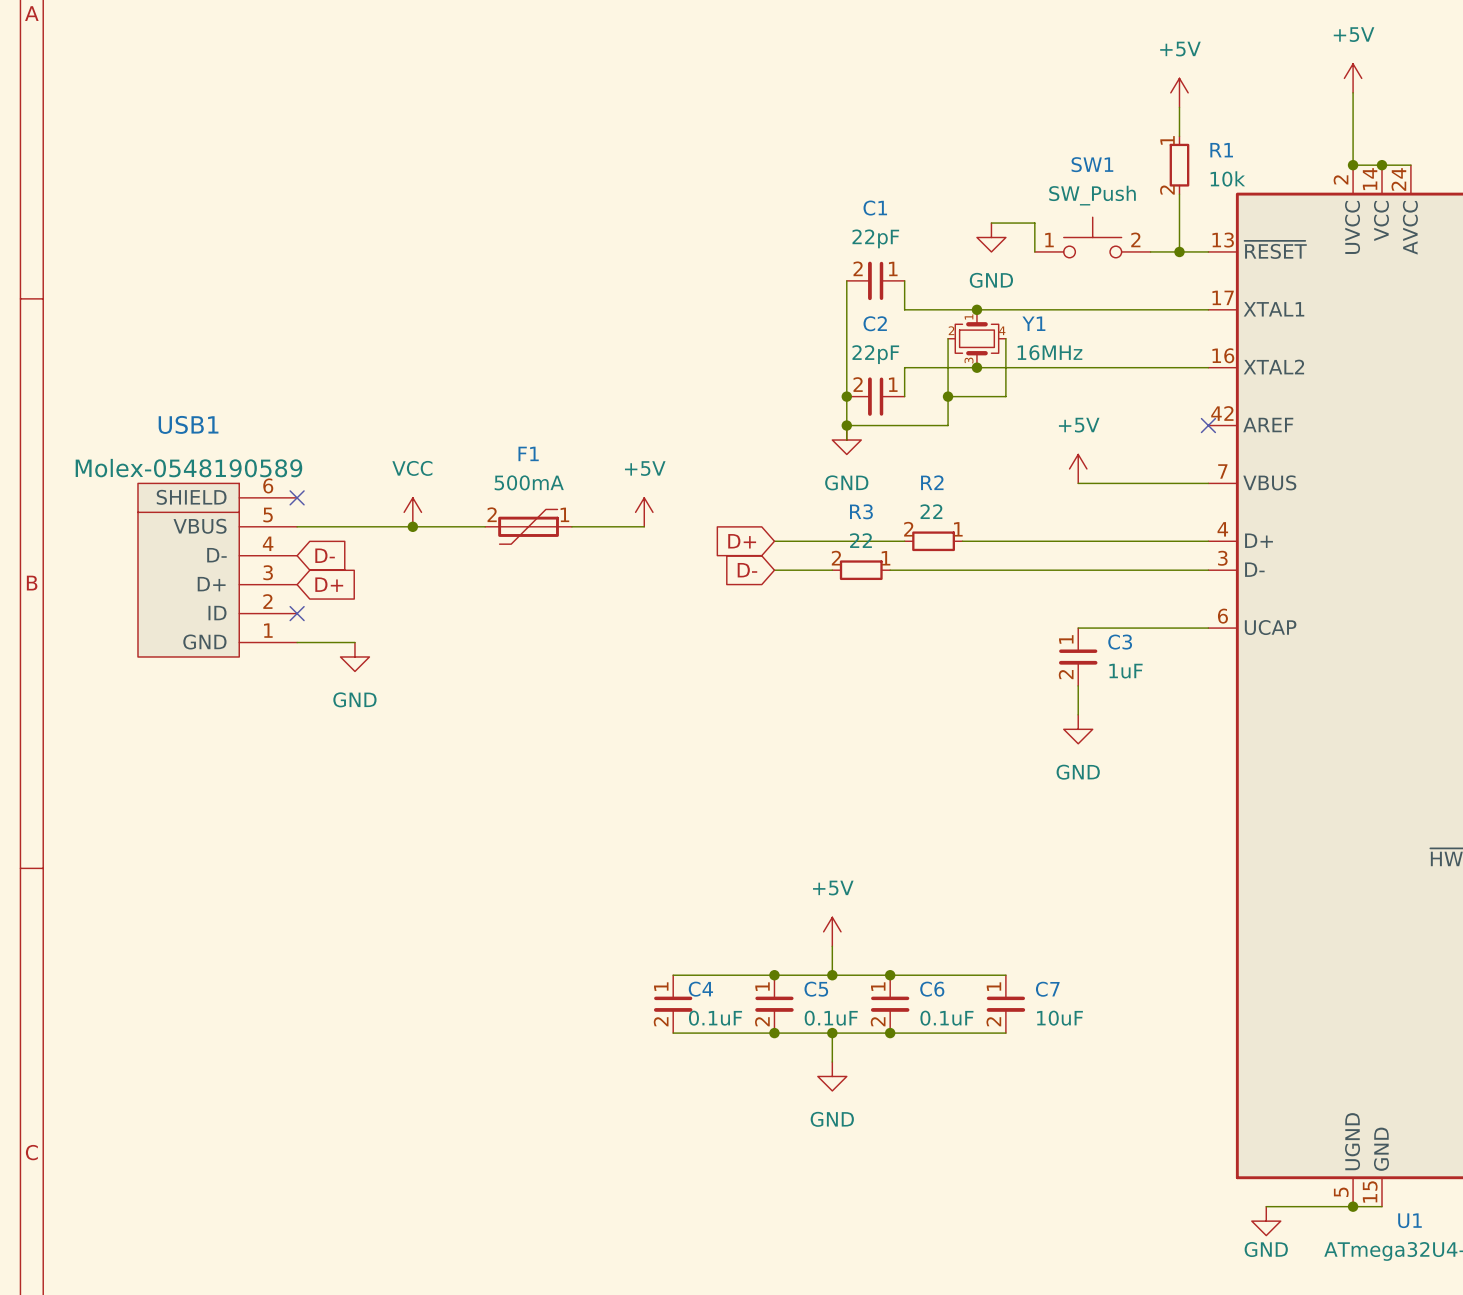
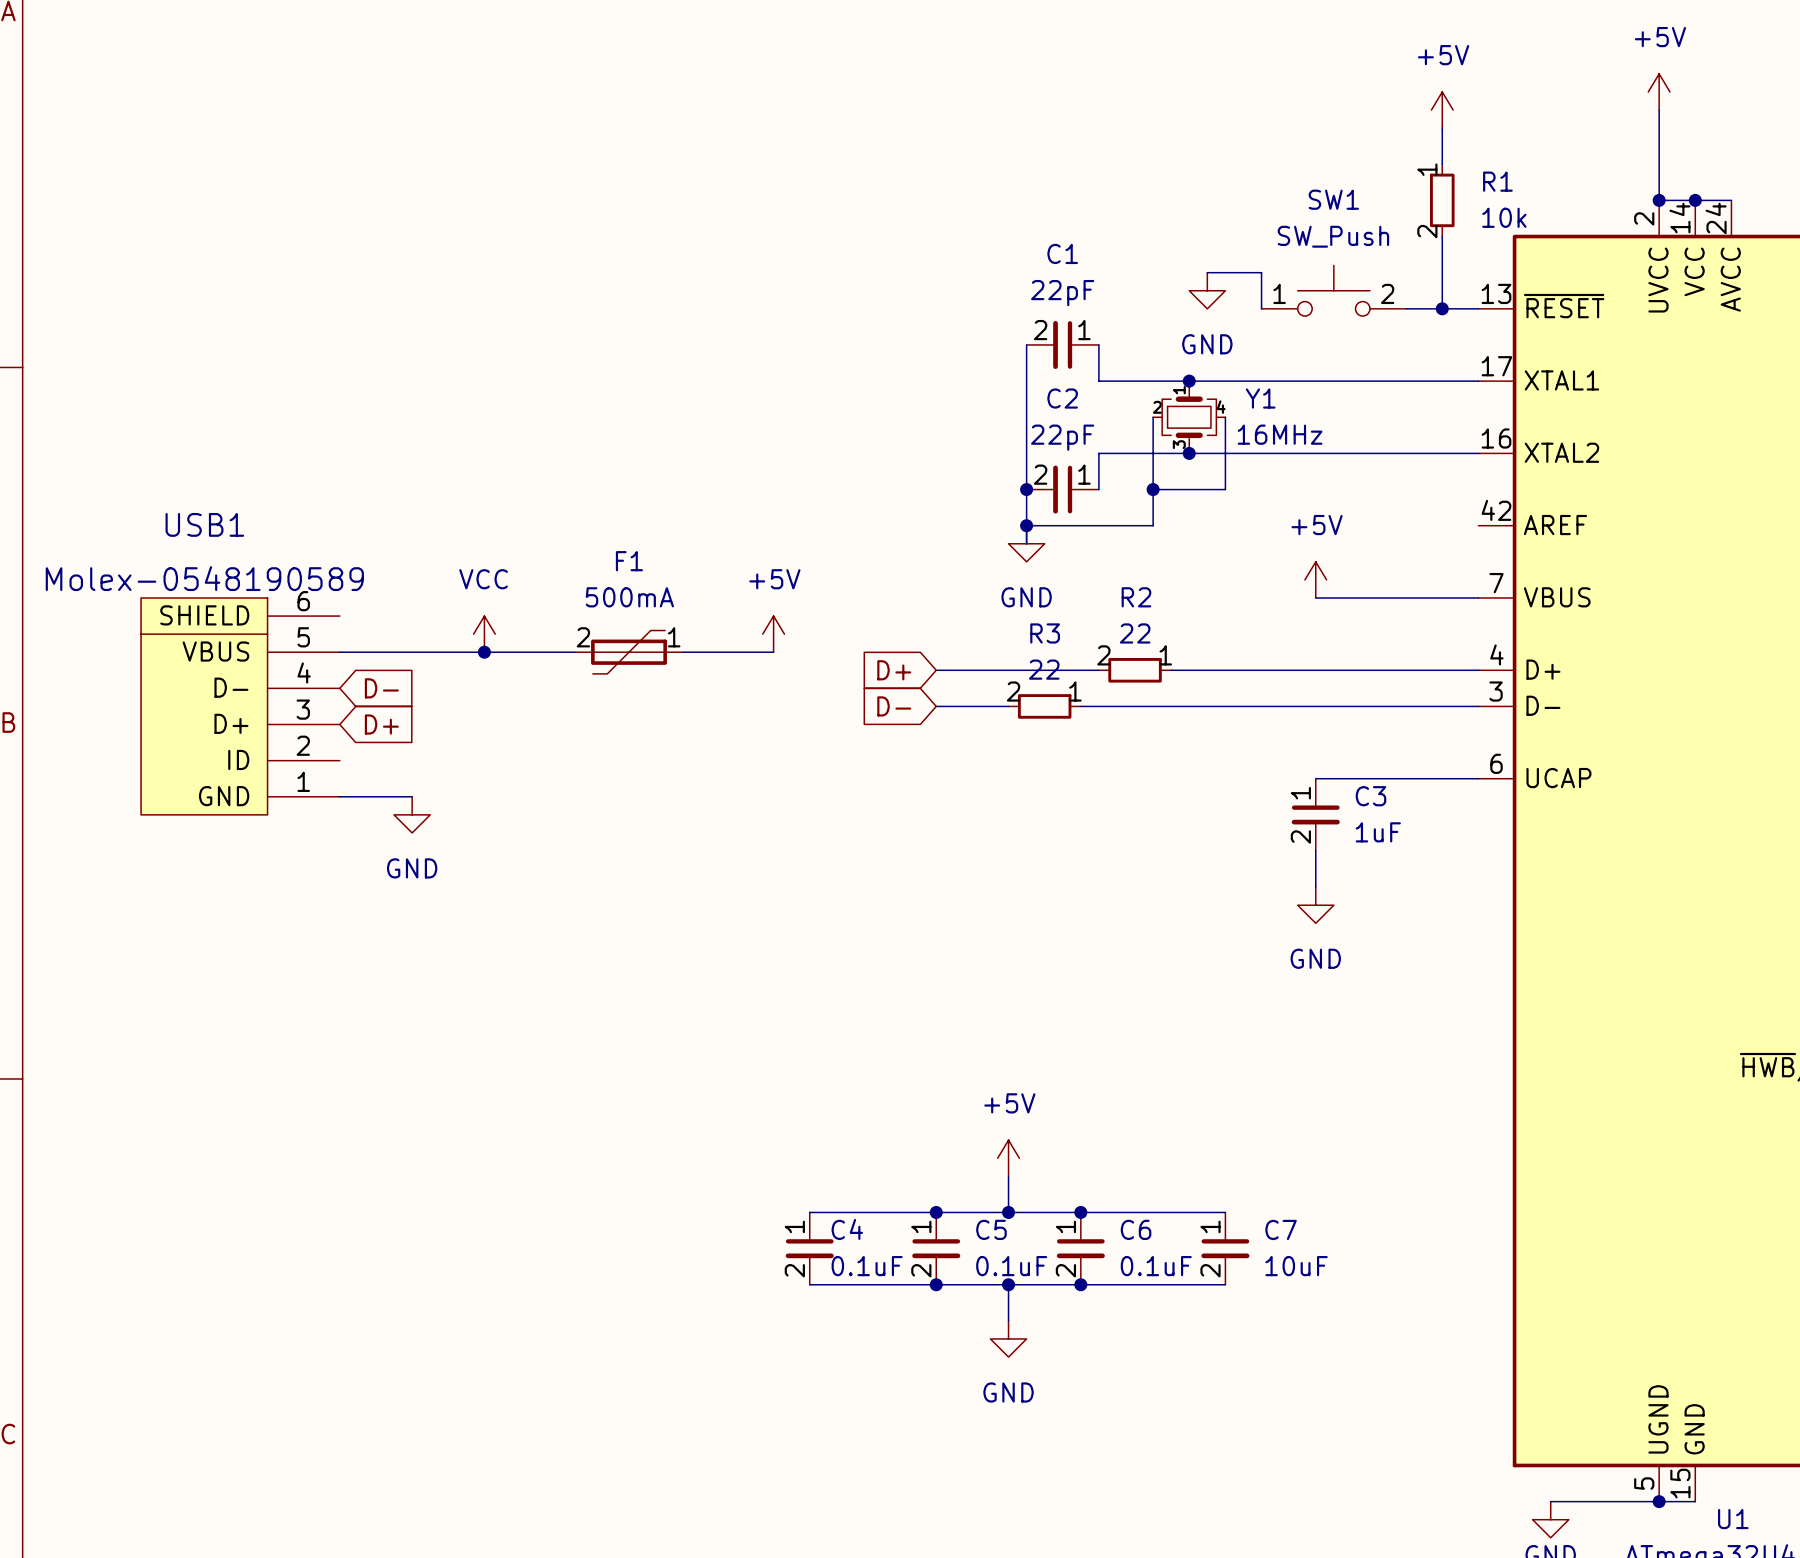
no-connect mark: (1208, 425) -> none
no-connect mark: (297, 497) -> none
no-connect mark: (297, 613) -> none

